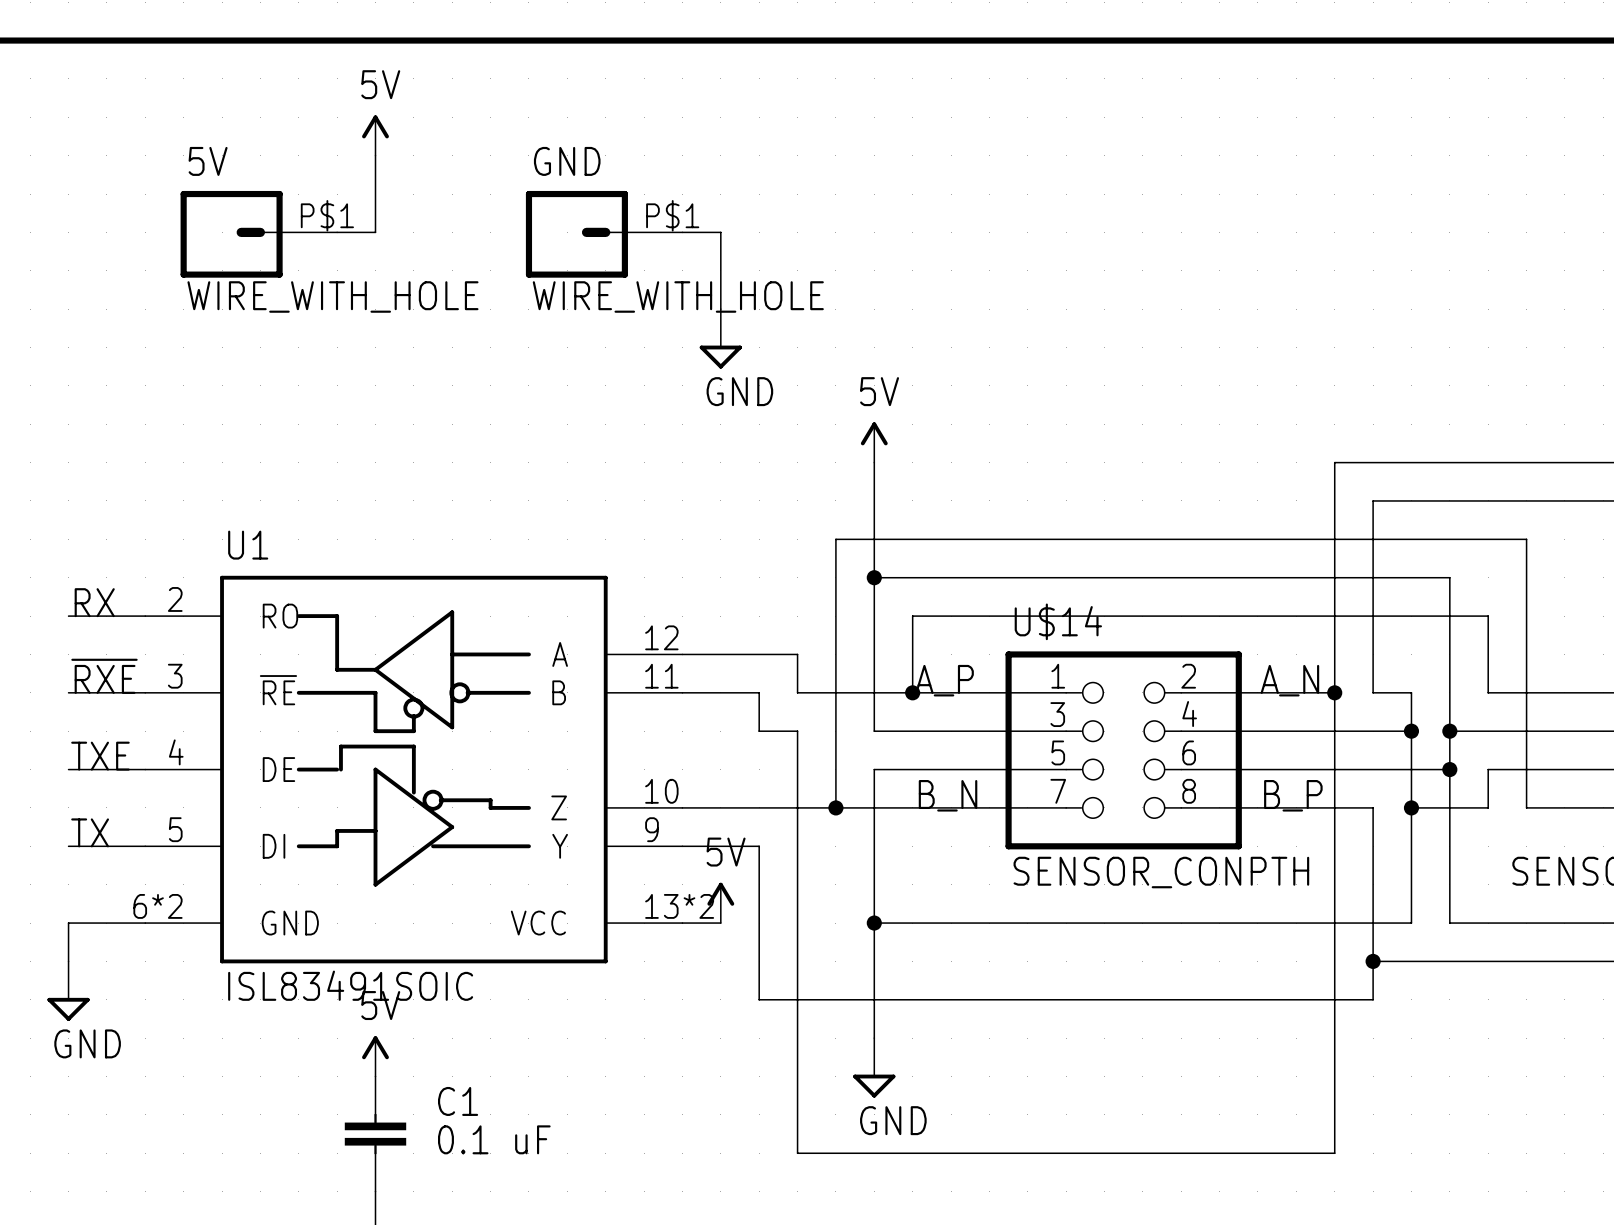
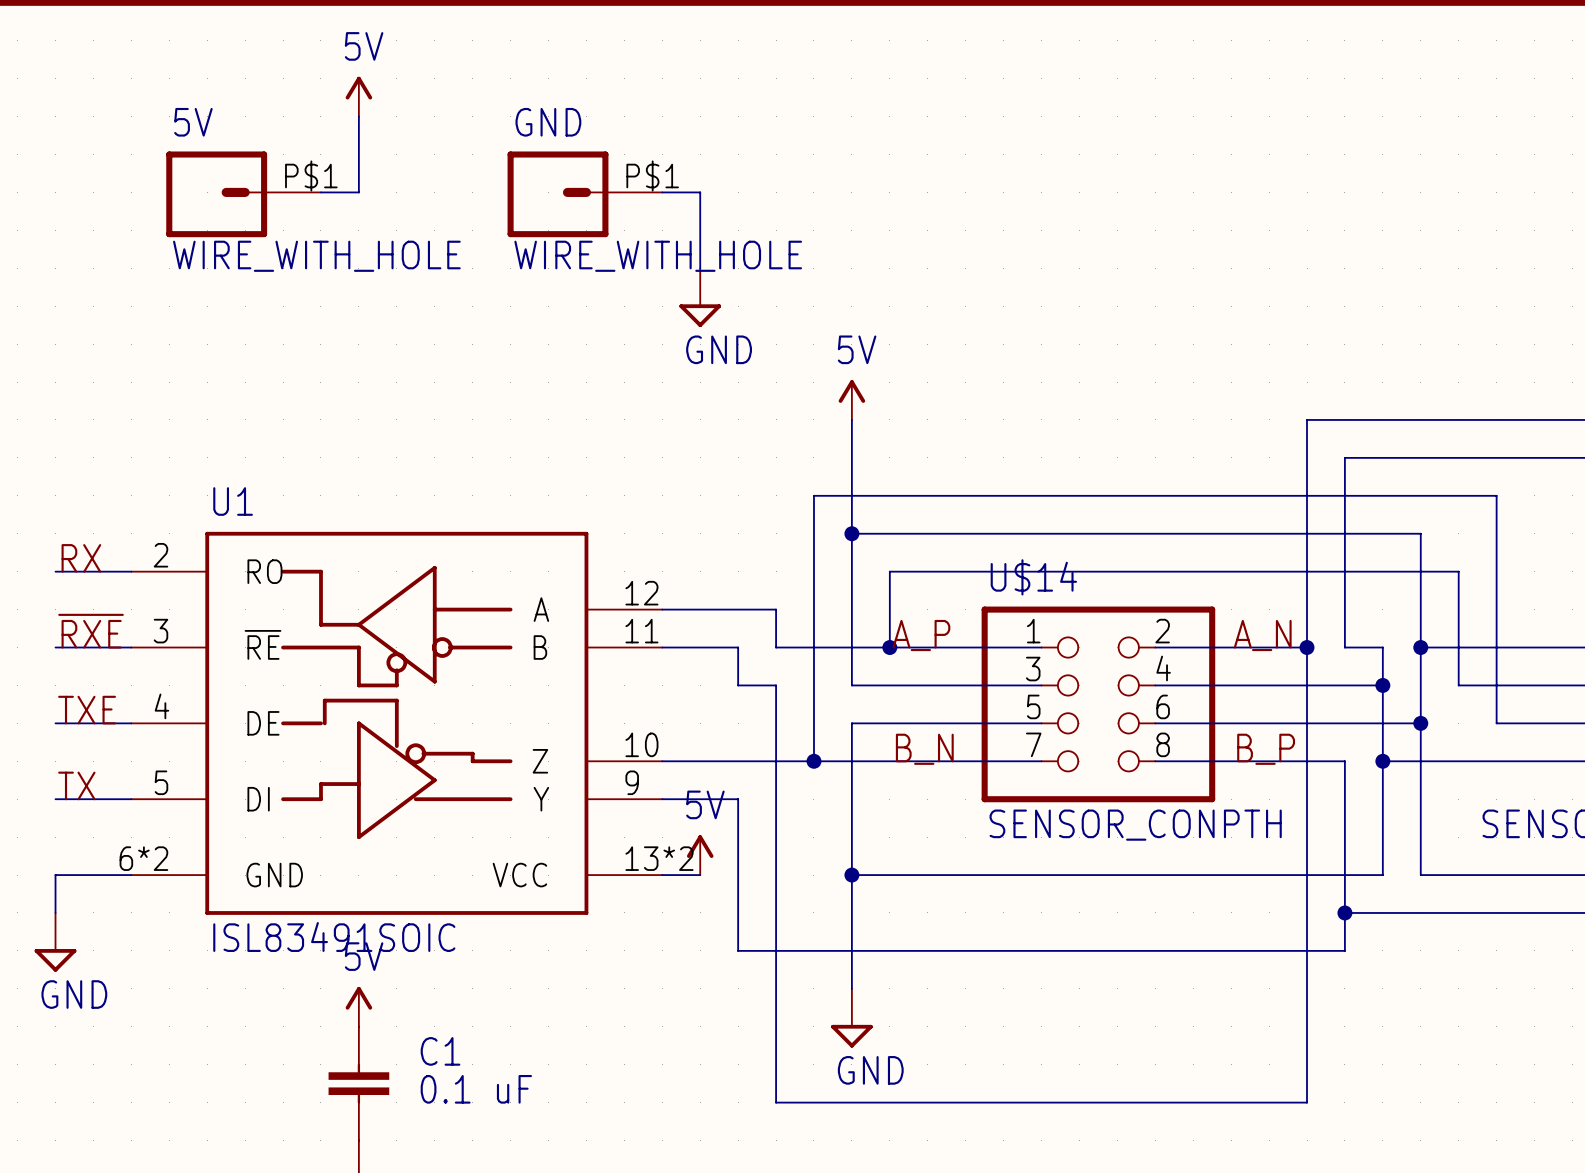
wire: (1449, 731) (1488, 731) -> (1420, 647) (1458, 647) (1458, 685)
junction position: (1449, 731) -> (1420, 647)
wire: (1488, 807) (1488, 769) (1526, 769) (1526, 807) -> (1458, 761) (1496, 761)

